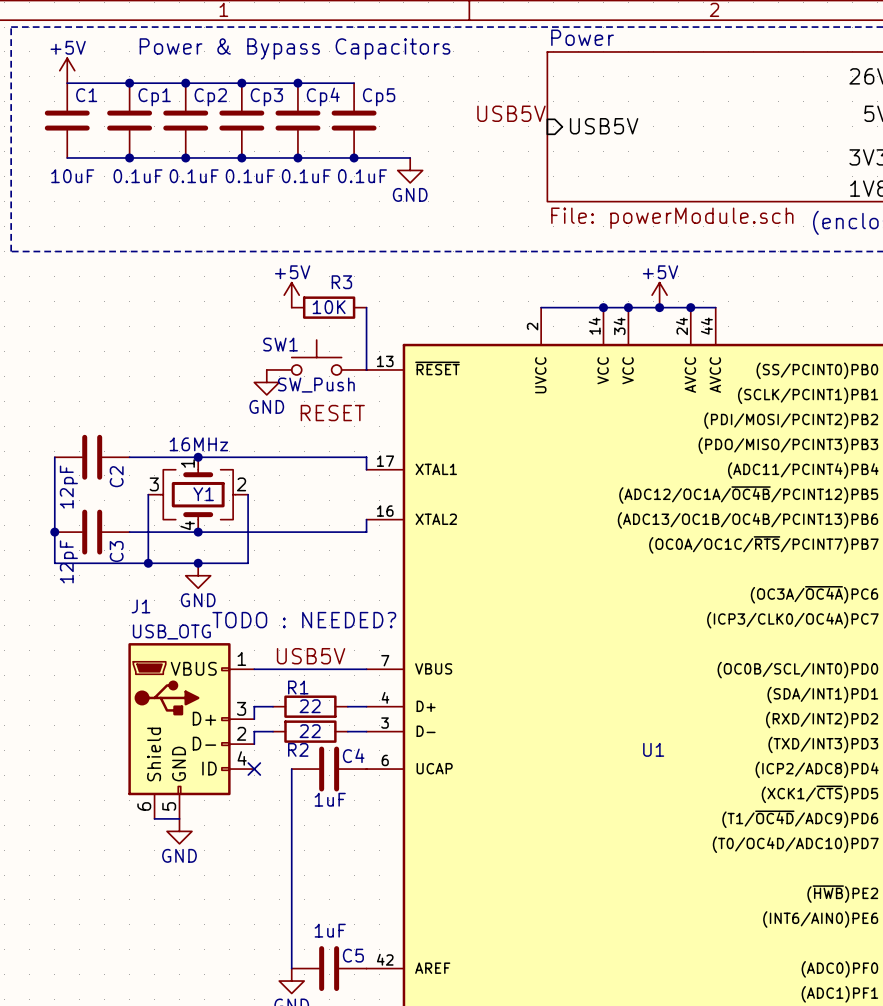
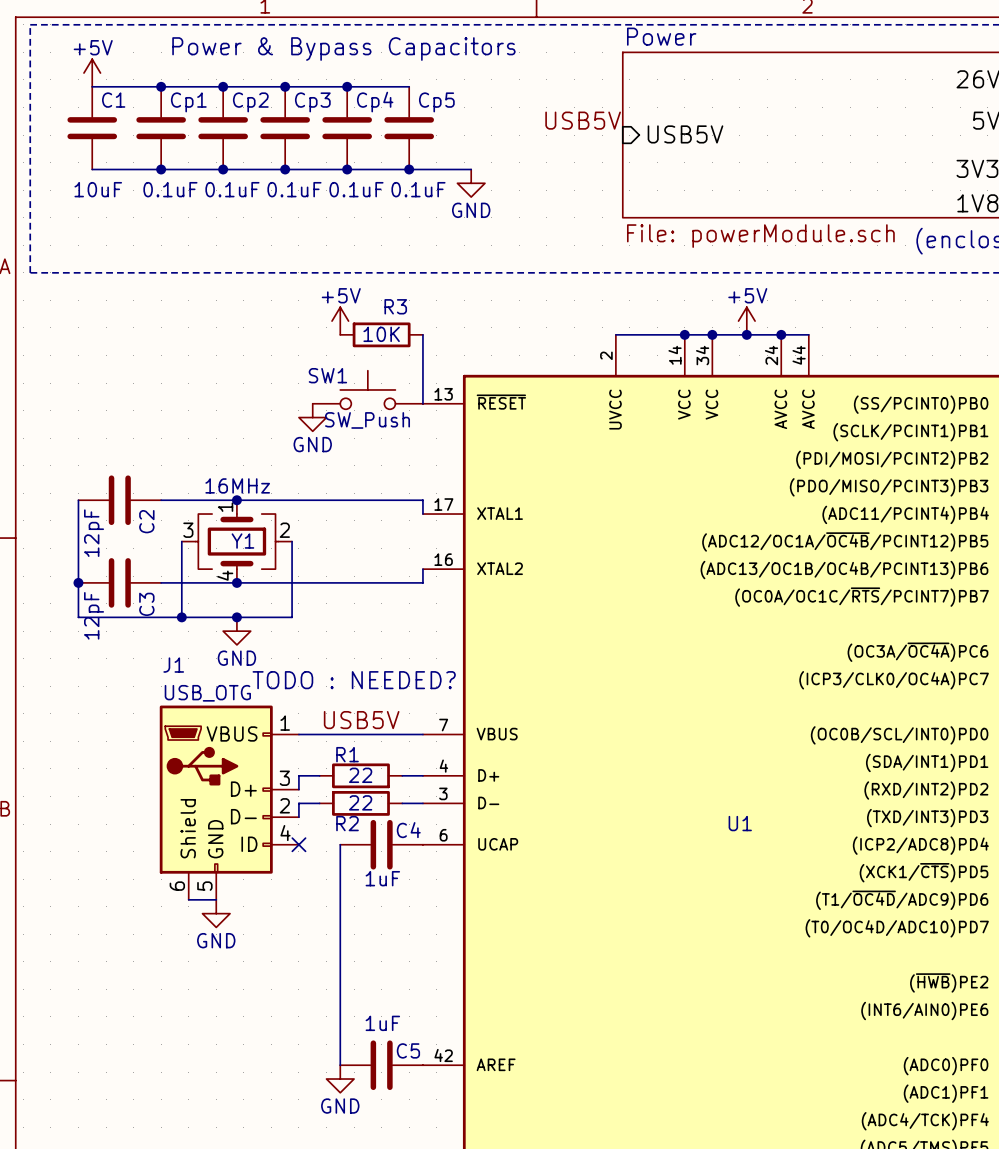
label: RESET (332, 413) -> none

